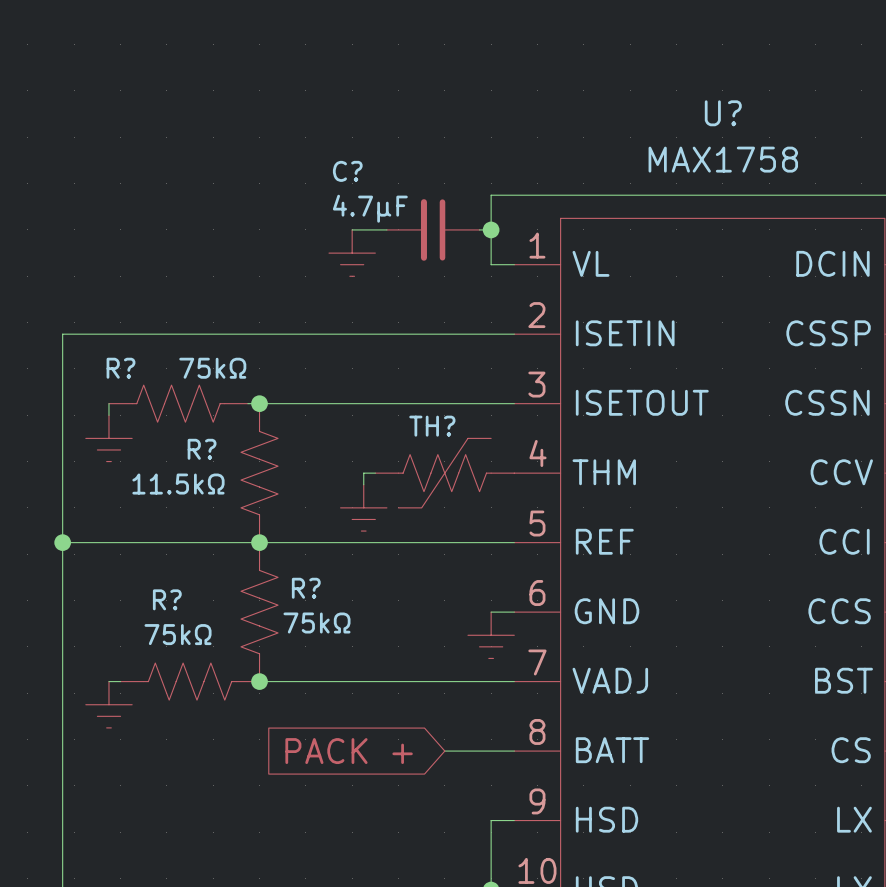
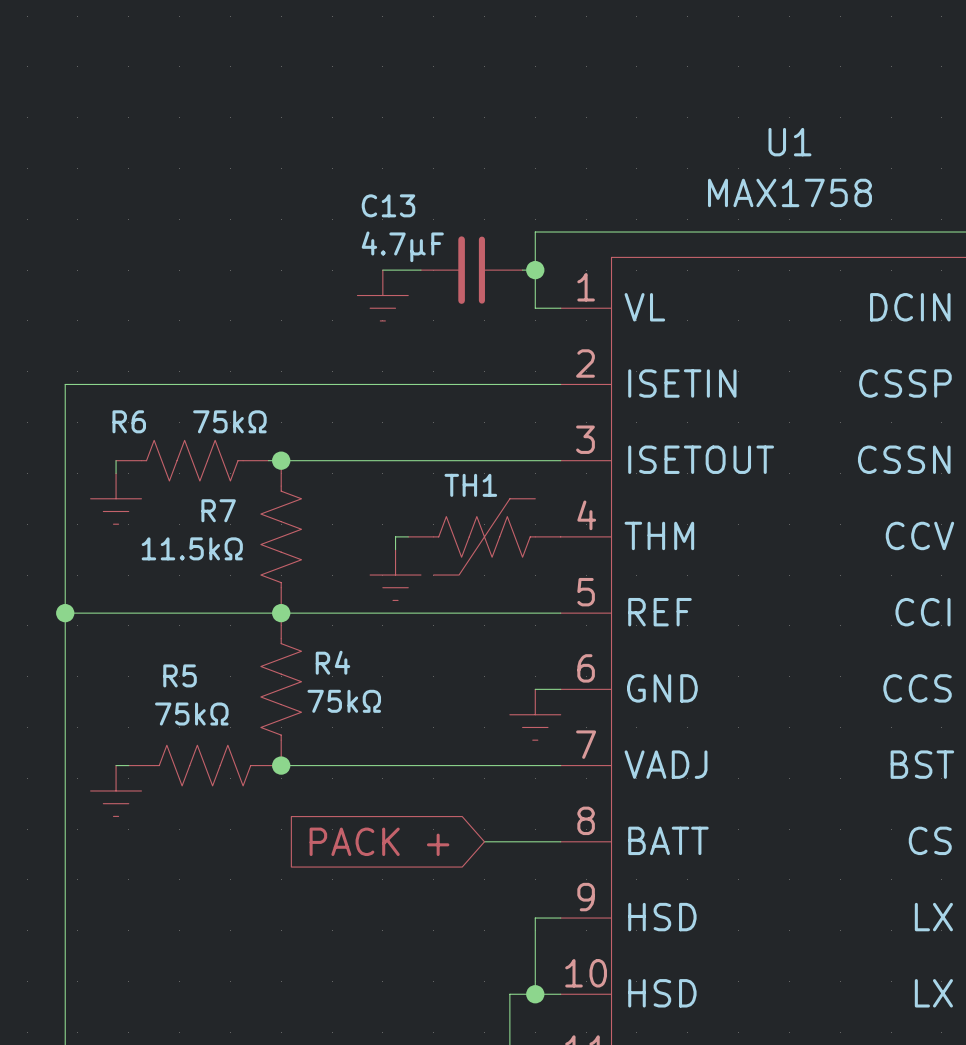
U? name: U? (723, 113) -> U1 (789, 142)
C? name: C? (347, 171) -> C13 (388, 205)
R? name: R? (120, 368) -> R6 (129, 421)
TH? name: TH? (432, 426) -> TH1 (470, 485)
R? name: R? (202, 449) -> R7 (218, 510)
R? name: R? (306, 588) -> R4 (332, 662)
R? name: R? (167, 599) -> R5 (180, 675)

